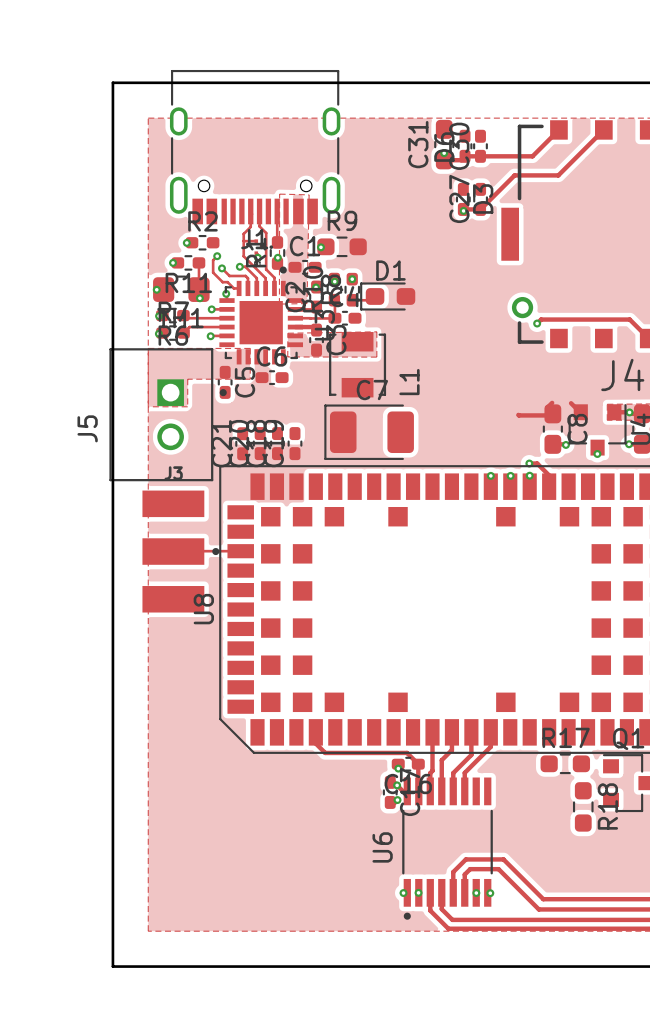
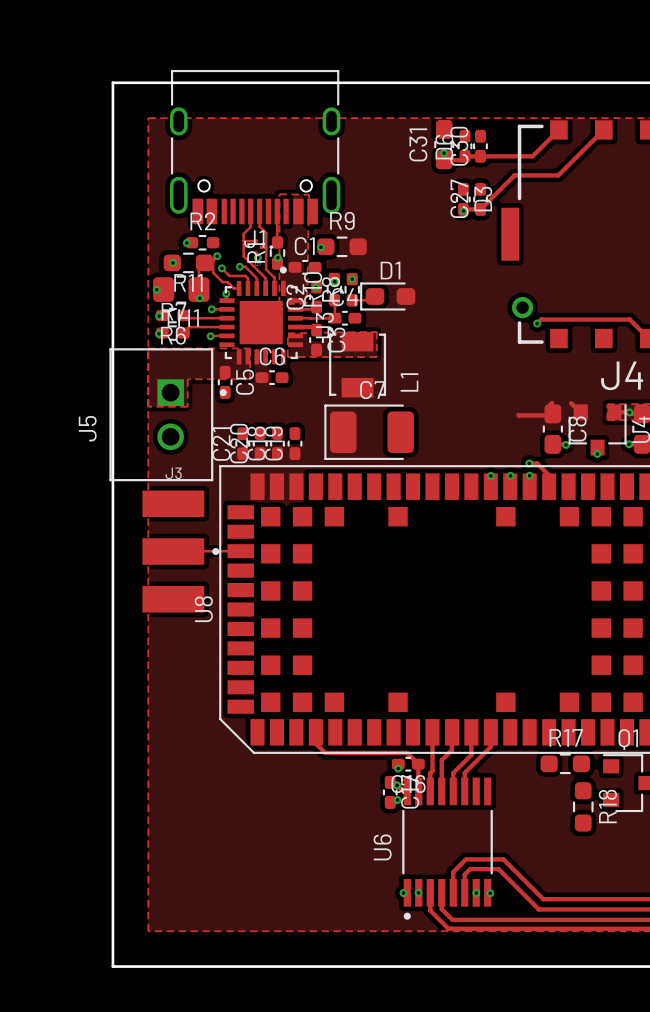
R11 footprint: [171, 255, 206, 271] -> [163, 252, 214, 274]

